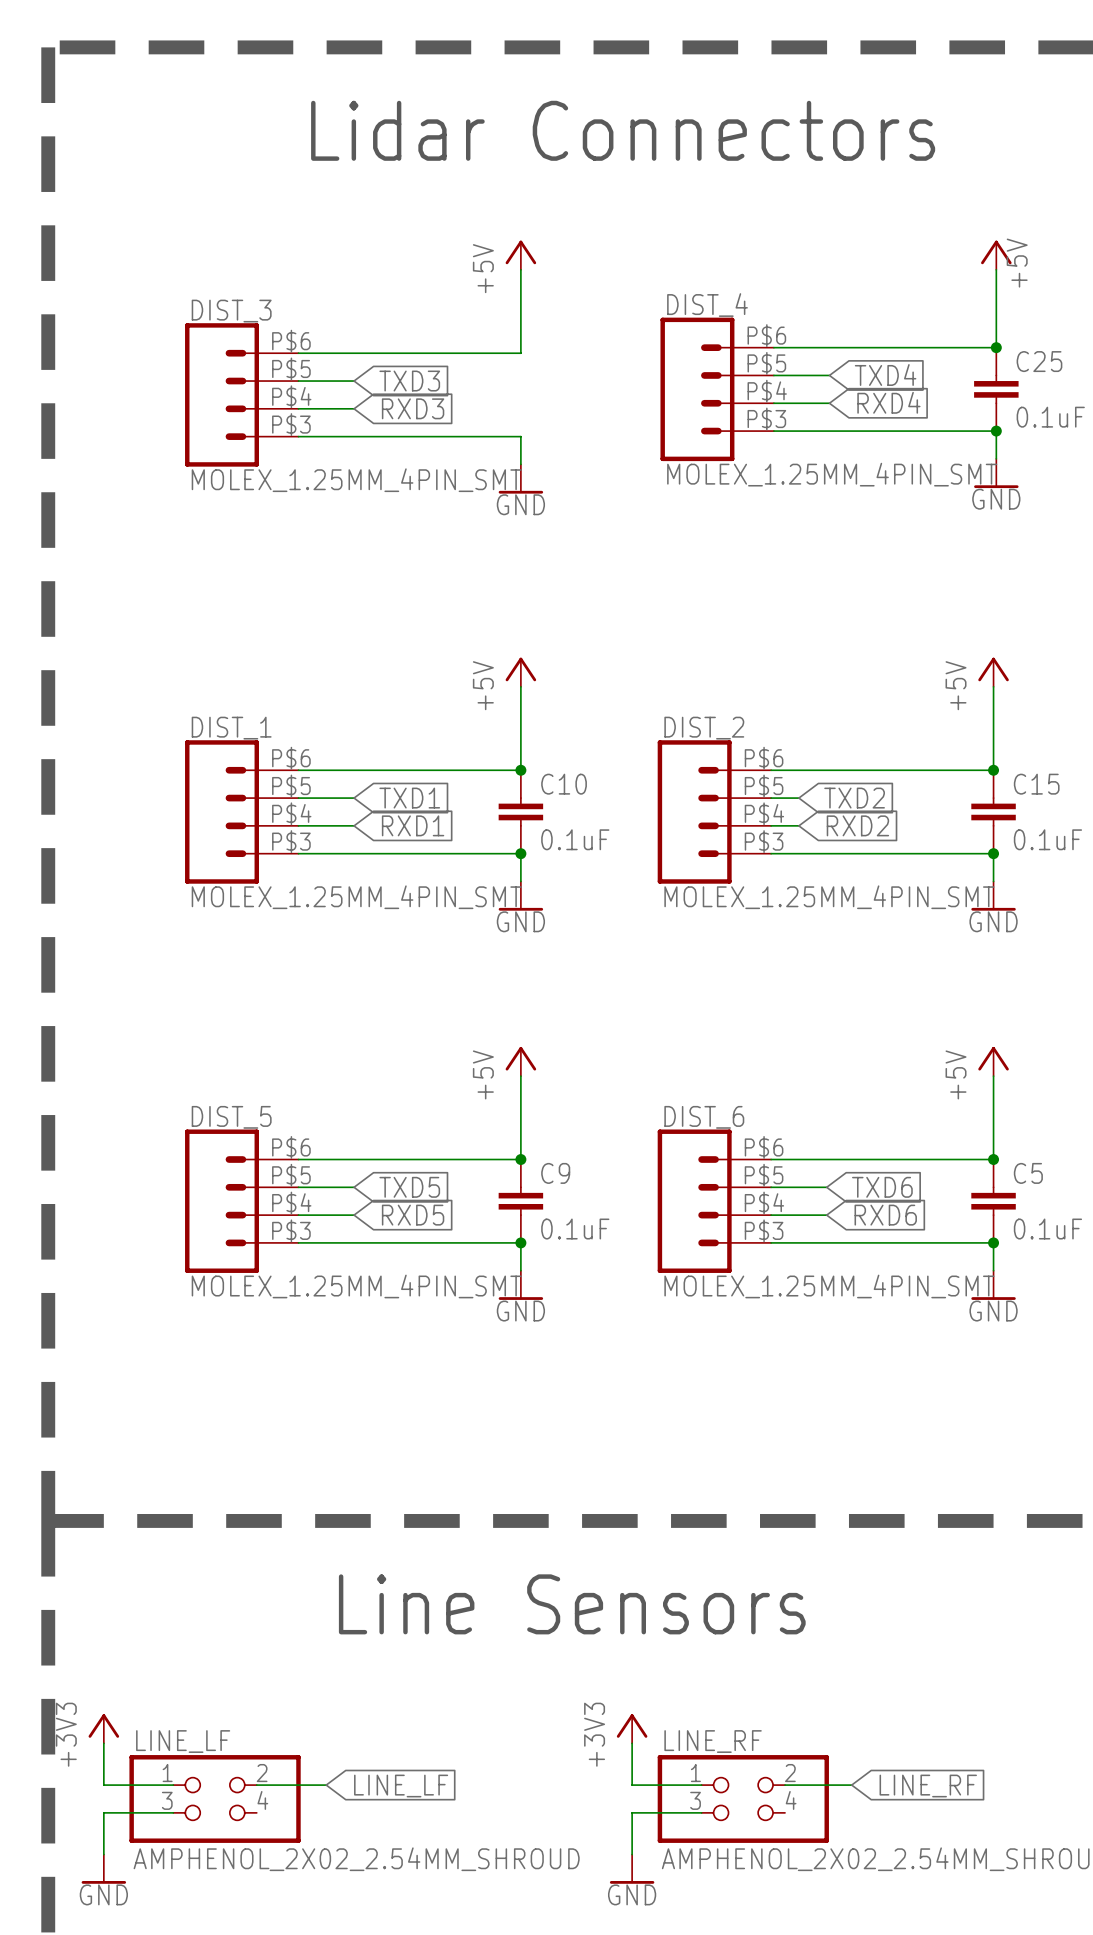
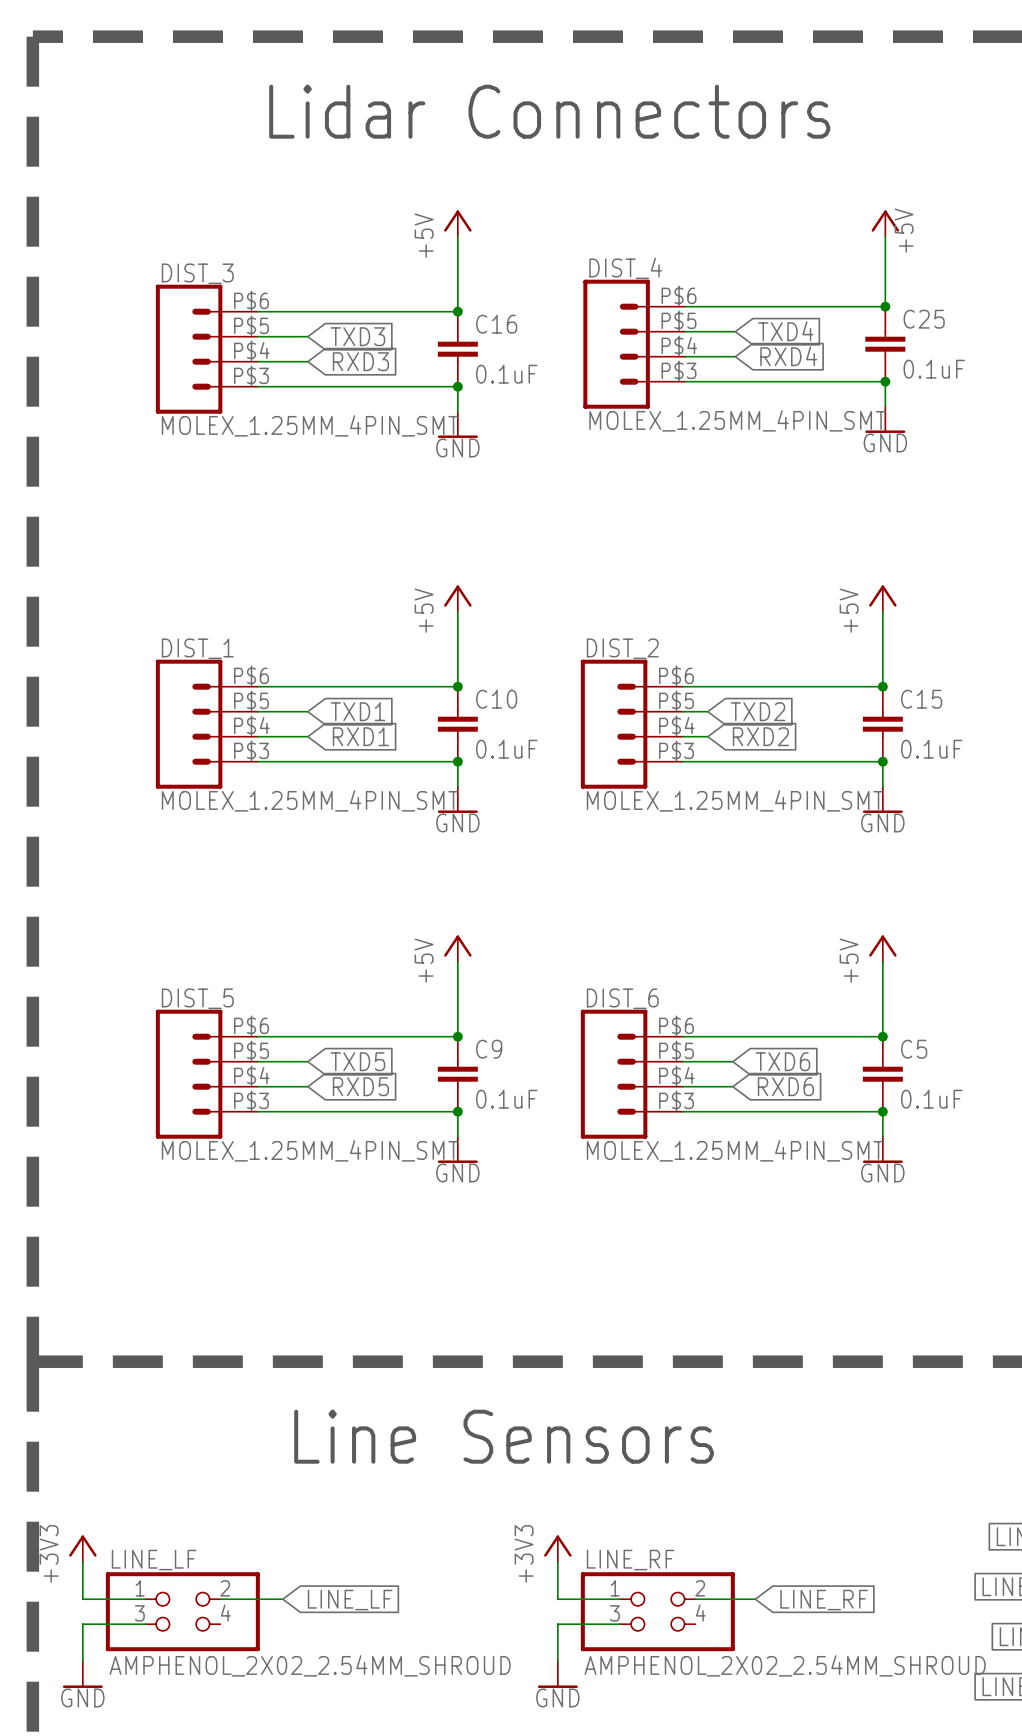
junction: none -> (457, 311)
C16: none -> 0.1uF (457, 349)
junction: none -> (457, 386)

